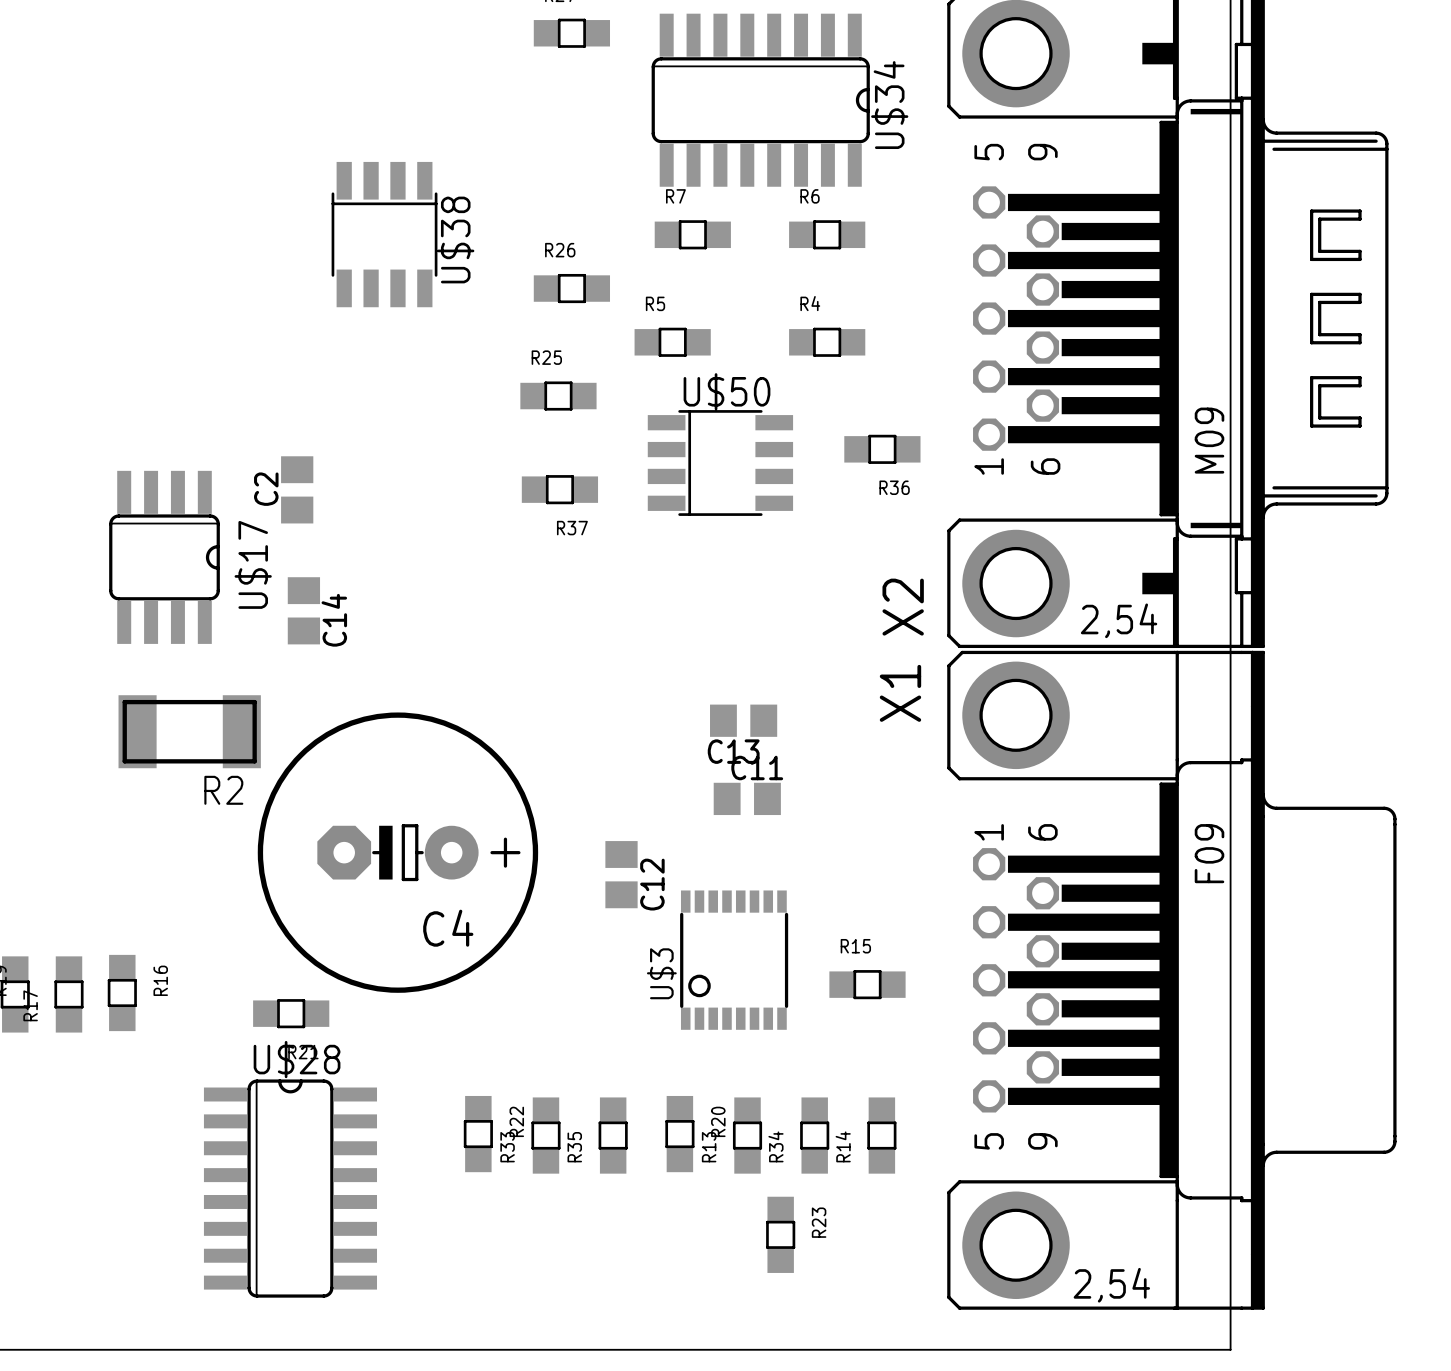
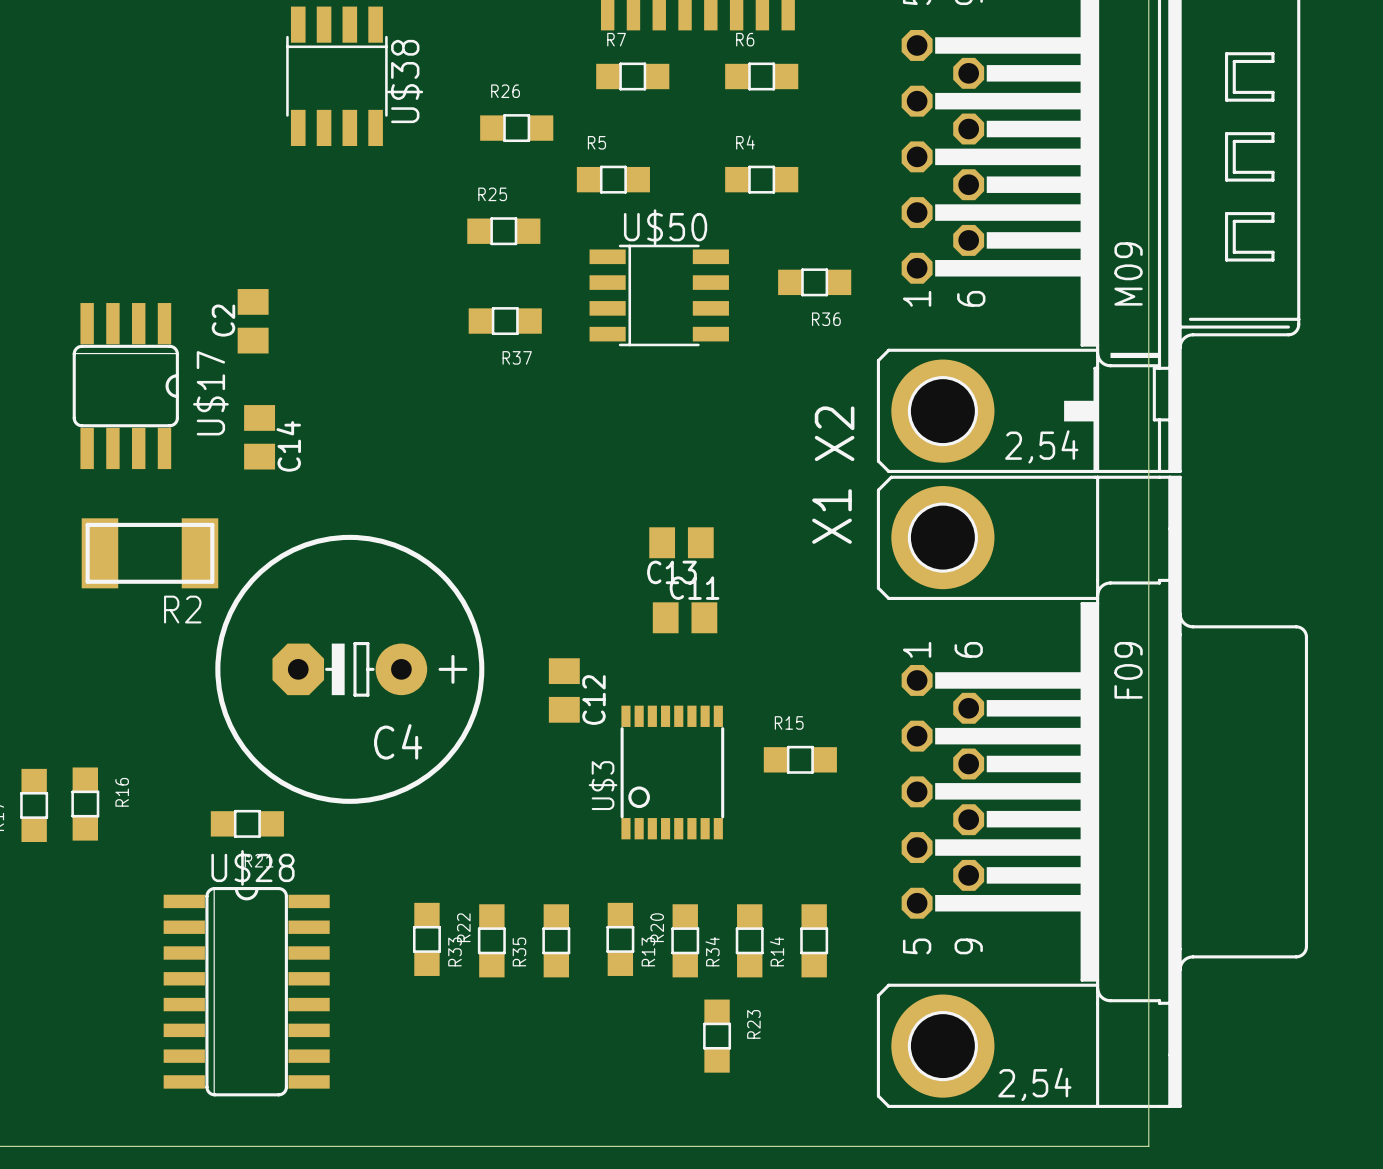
R15 position: (867, 984) -> (800, 759)

